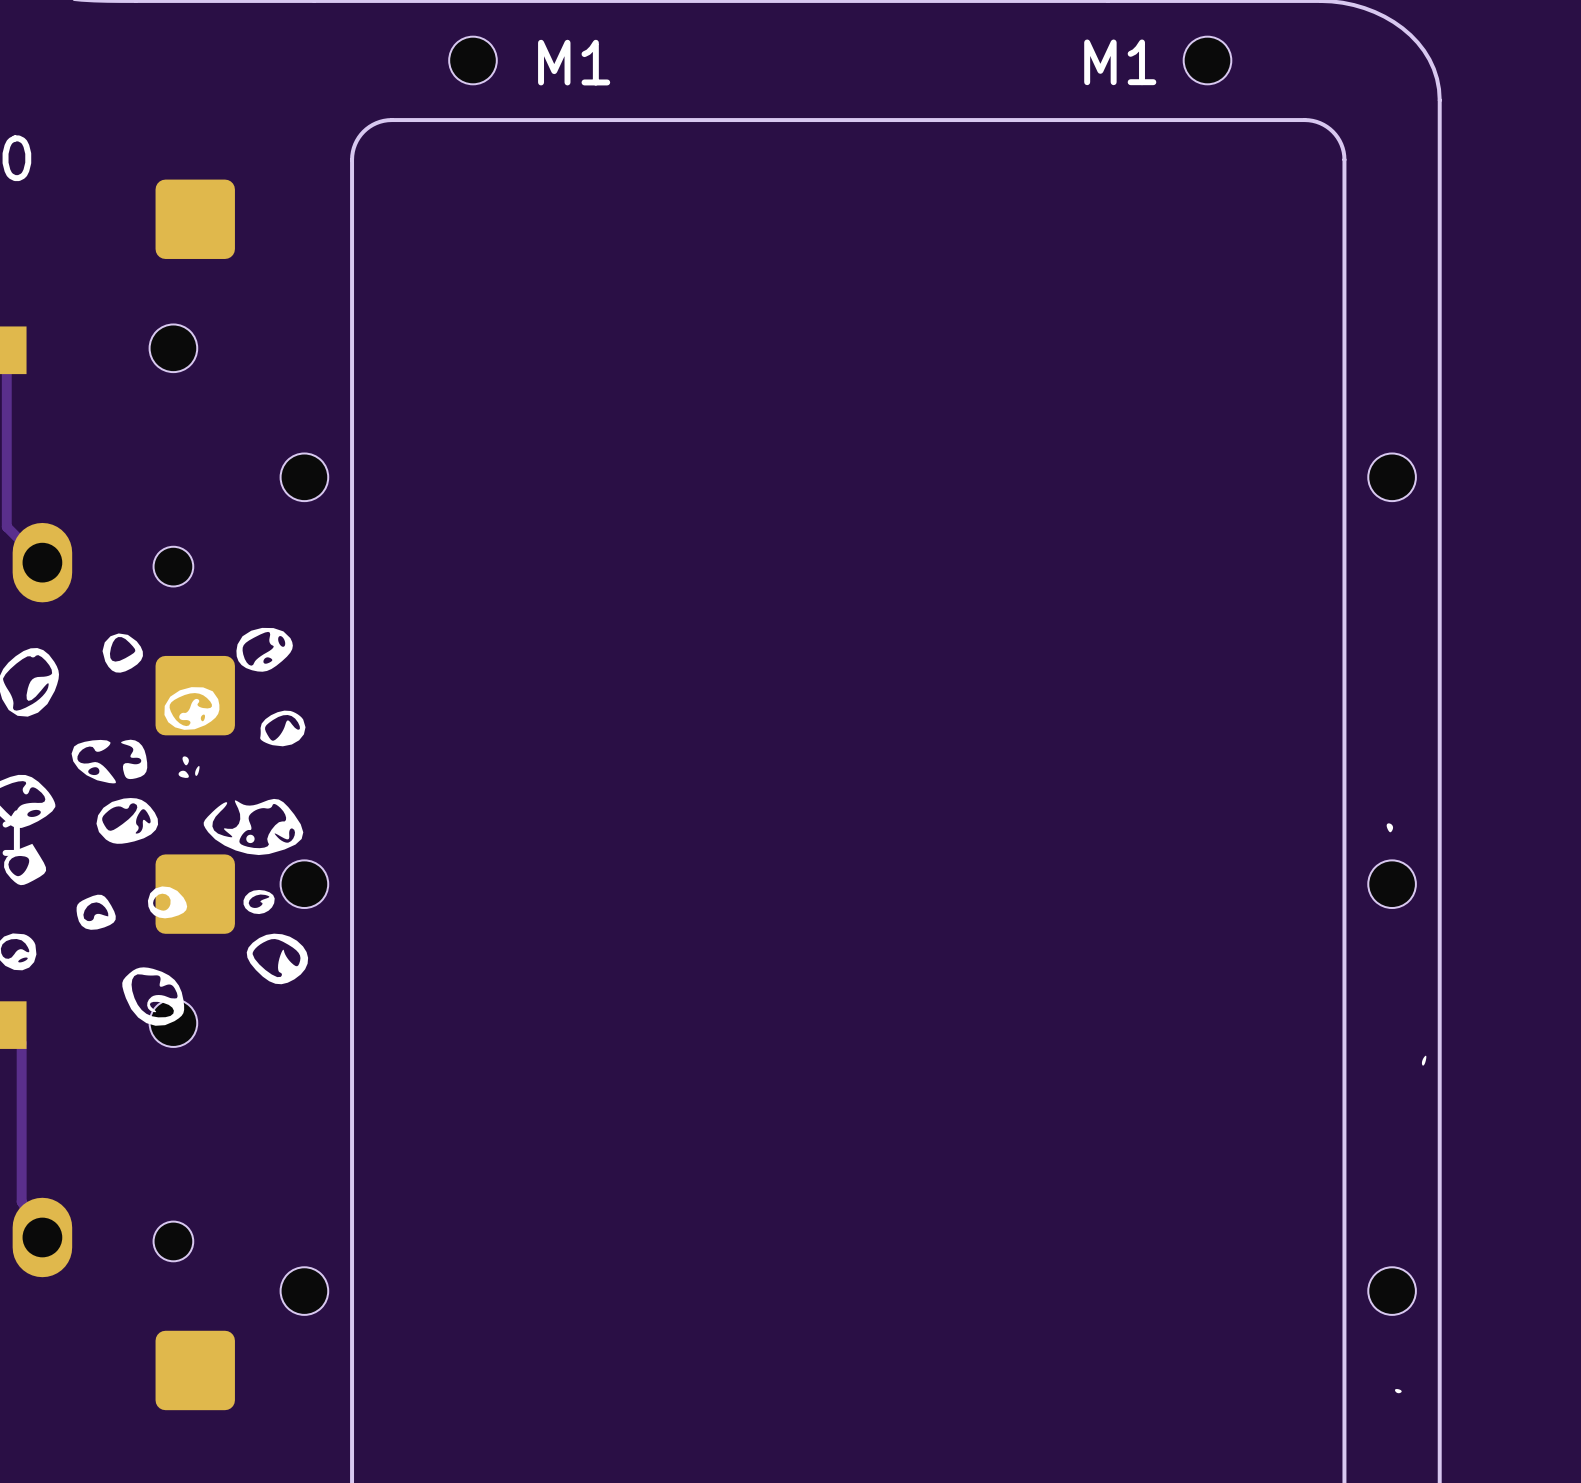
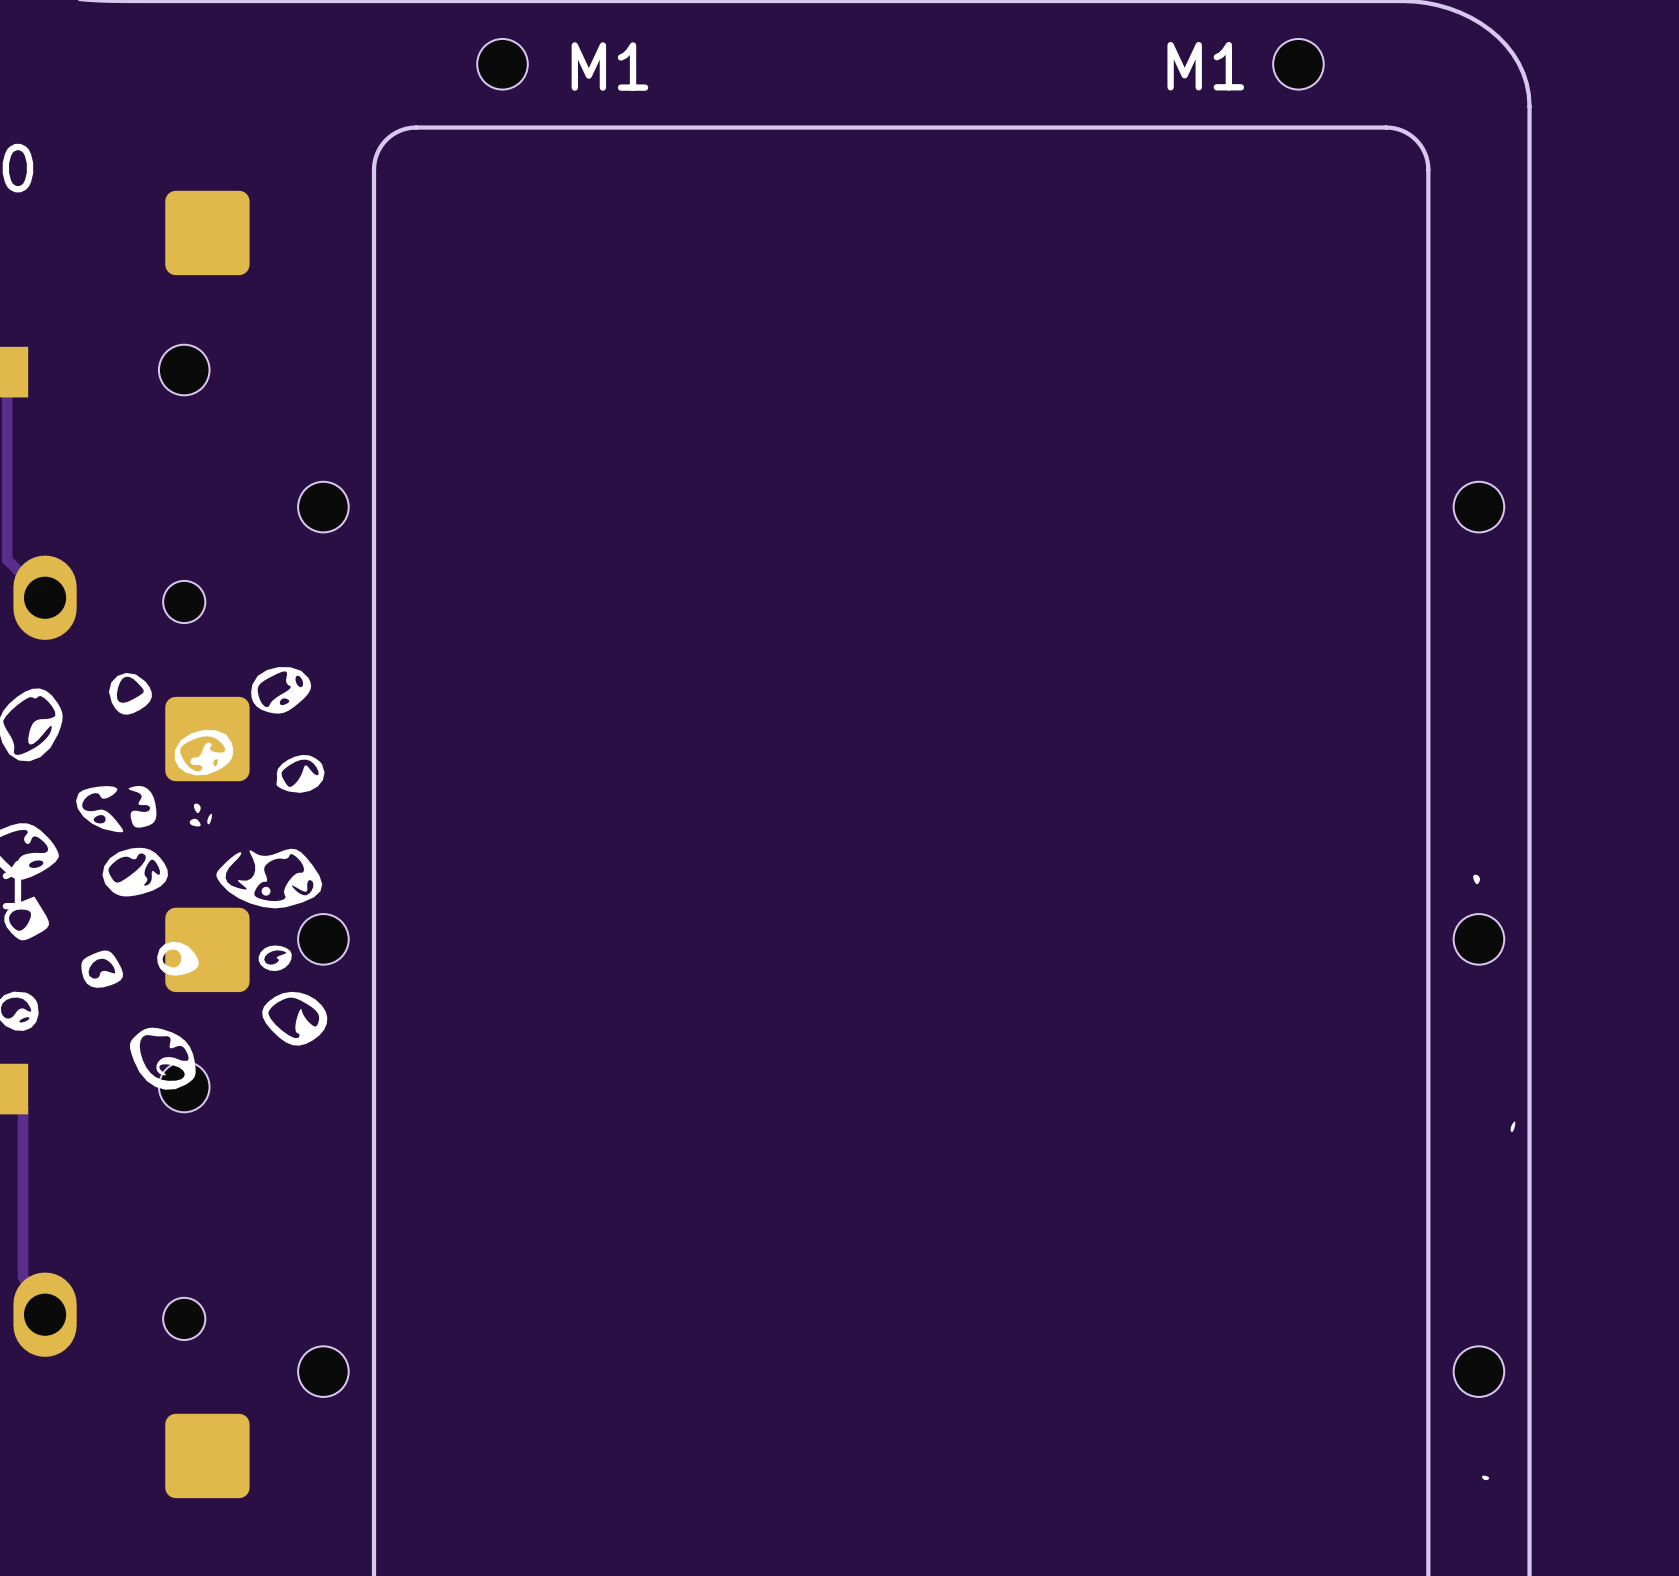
M1 position: (1207, 60) -> (1298, 64)

